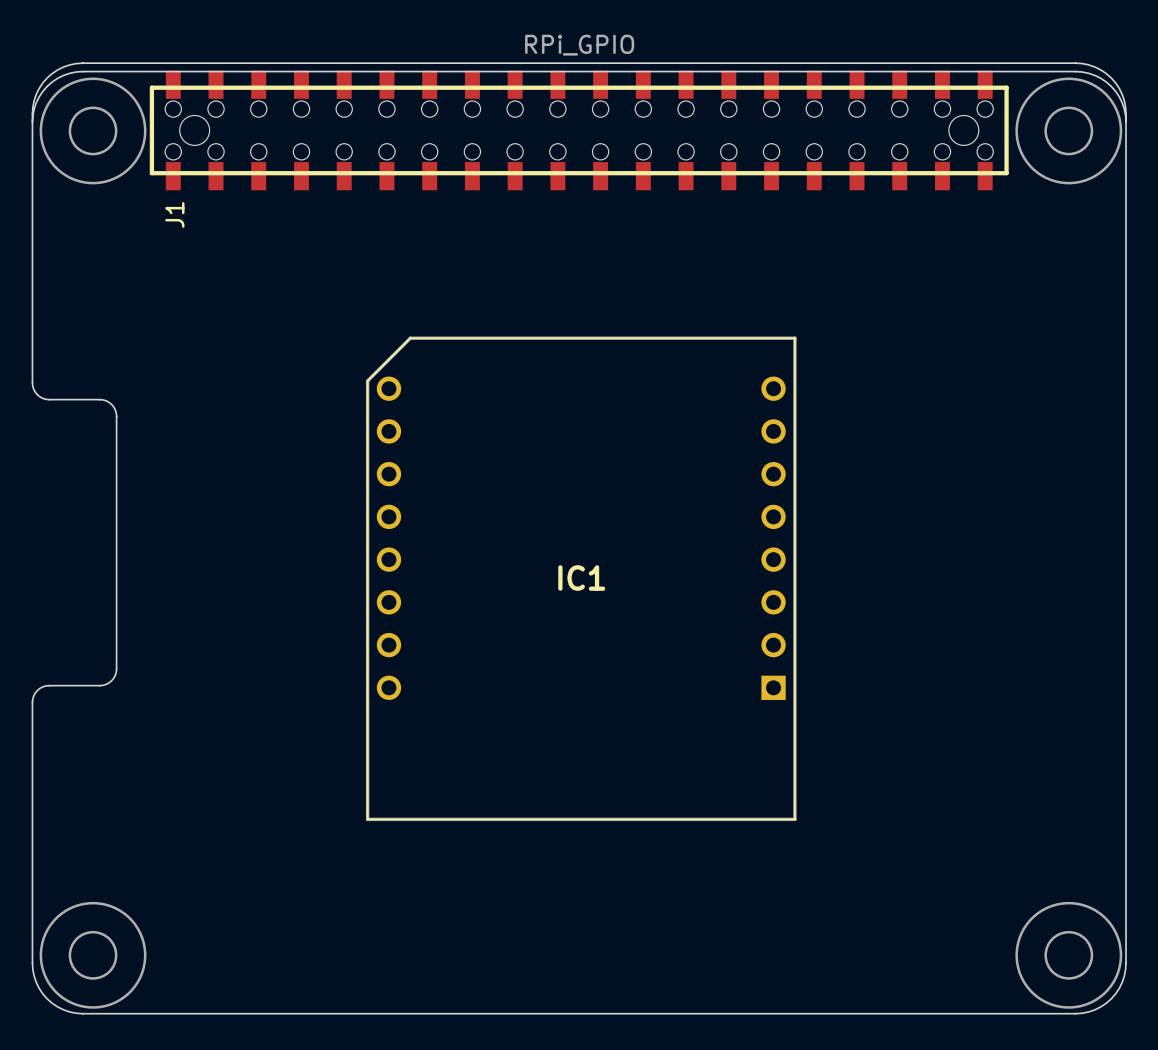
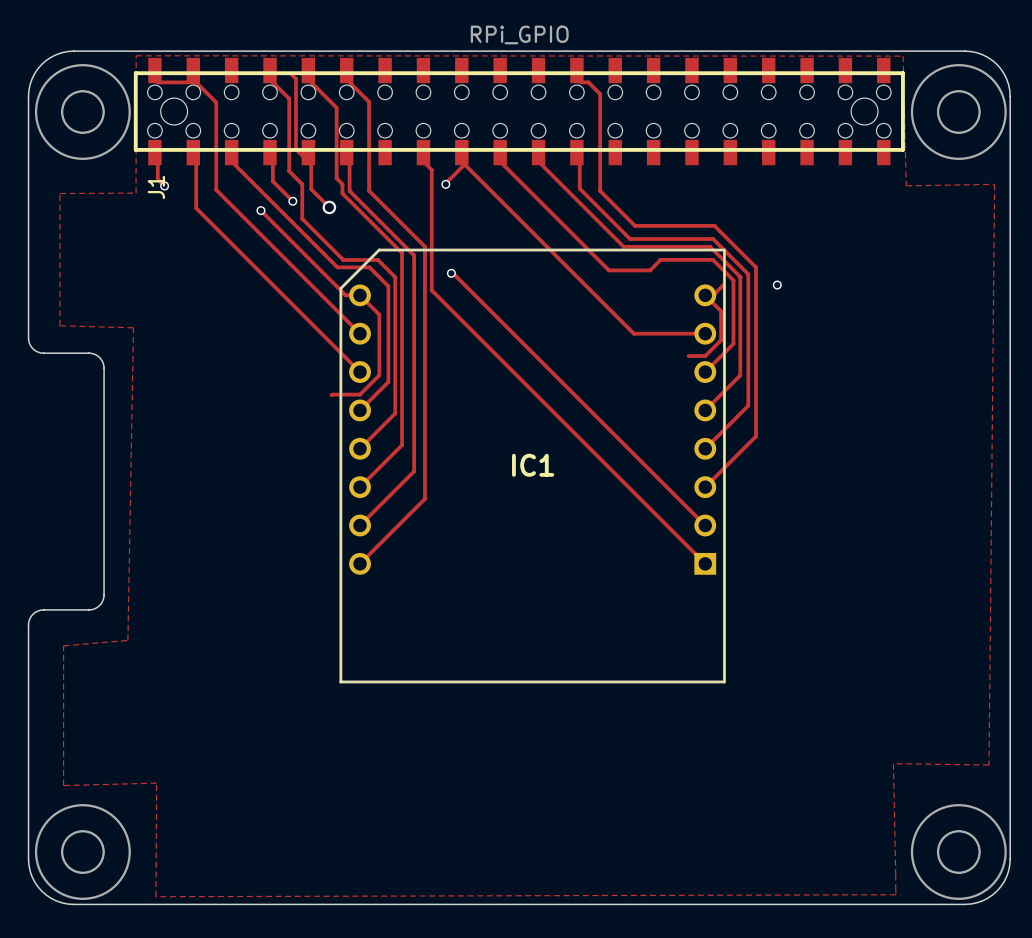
zone outline: none -> (136, 55) (136, 193) (59, 193) (59, 325) (133, 327) (127, 640) (63, 645) (63, 785) (156, 783) (156, 896) (896, 894) (893, 763) (989, 765) (994, 184) (906, 185) (903, 56) (136, 55)
track: none -> (291, 73) (295, 78) (295, 149) (311, 164) (311, 189) (329, 207)
track: none -> (157, 82) (196, 82) (216, 102) (216, 189) (360, 333)
track: none -> (272, 82) (289, 98) (289, 171) (302, 184) (302, 218) (343, 260) (378, 260) (395, 277) (395, 413) (360, 448)
track: none -> (311, 82) (336, 107) (336, 178) (342, 184) (342, 193) (402, 253) (402, 445) (360, 487)
track: none -> (349, 82) (369, 101) (369, 190) (424, 246) (424, 498) (360, 563)
track: none -> (579, 82) (588, 82) (600, 94) (600, 190) (635, 225) (714, 225) (756, 267) (756, 436) (705, 487)
board edge: (32, 122) (36, 102) (47, 86) (63, 75) (82, 71) (1075, 71) (1094, 75) (1111, 86) (1122, 102) (1126, 122) -> none
track: none -> (157, 164) (157, 179) (164, 186)
track: none -> (196, 164) (196, 208) (360, 372)
track: none -> (234, 164) (337, 267) (369, 267) (388, 286) (388, 382) (360, 410)
track: none -> (272, 164) (272, 181) (292, 201)
track: none -> (349, 164) (349, 190) (414, 255) (414, 471) (360, 525)
track: none -> (426, 164) (431, 169) (431, 290) (705, 563)
track: none -> (503, 164) (608, 270) (650, 270) (660, 259) (712, 259) (733, 280) (733, 343) (705, 372)
track: none -> (541, 164) (623, 246) (710, 246) (740, 277) (740, 375) (705, 410)
track: none -> (579, 164) (579, 188) (630, 239) (713, 239) (748, 274) (748, 405) (705, 448)
track: none -> (445, 184) (464, 164) (633, 333) (705, 333)
via: none -> (445, 184)
via: none -> (164, 186)
via: none -> (292, 201)
via: none -> (329, 207)
track: none -> (260, 210) (345, 295) (360, 295) (379, 314) (379, 375) (360, 394) (331, 395)
via: none -> (260, 210)
track: none -> (451, 273) (705, 525)
via: none -> (451, 273)
track: none -> (724, 284) (713, 295) (705, 295) (721, 311) (721, 340) (705, 356) (688, 356)
via: none -> (777, 285)
IC1 position: (581, 578) -> (532, 465)

